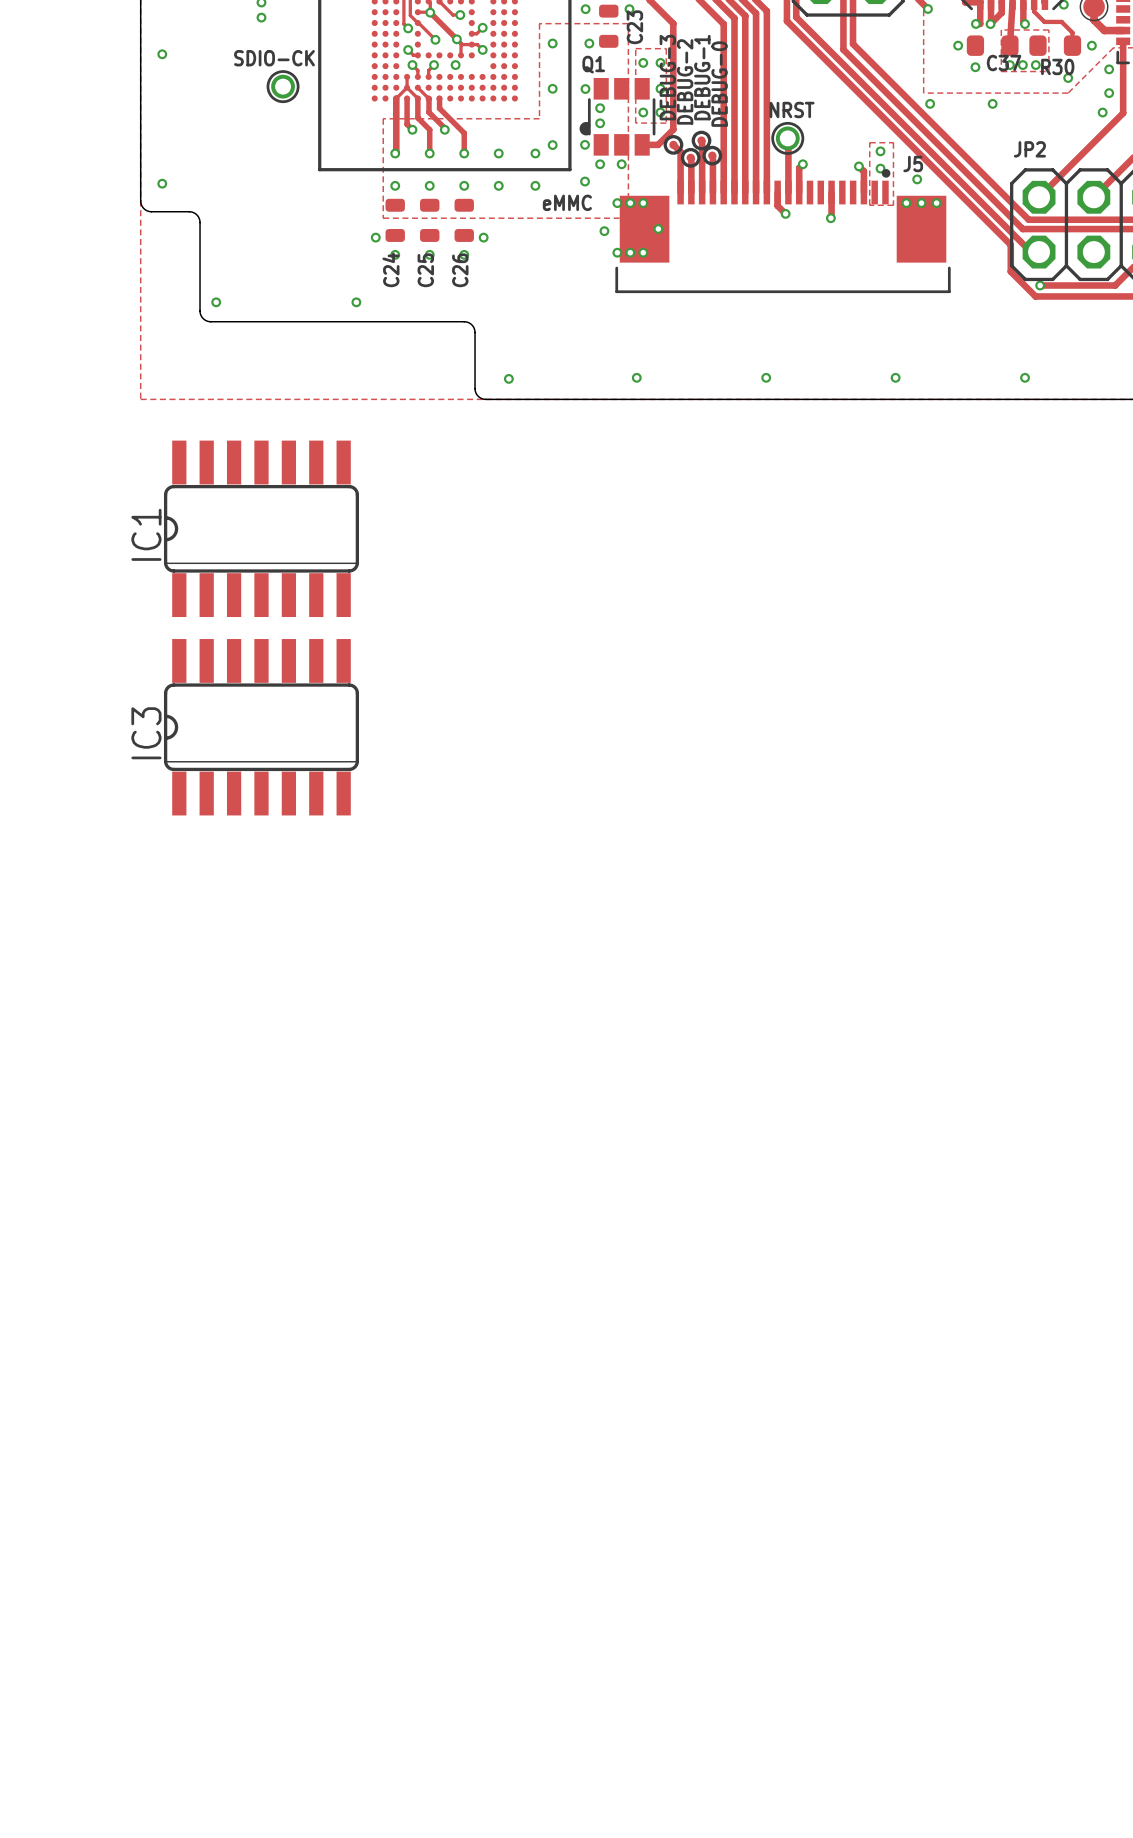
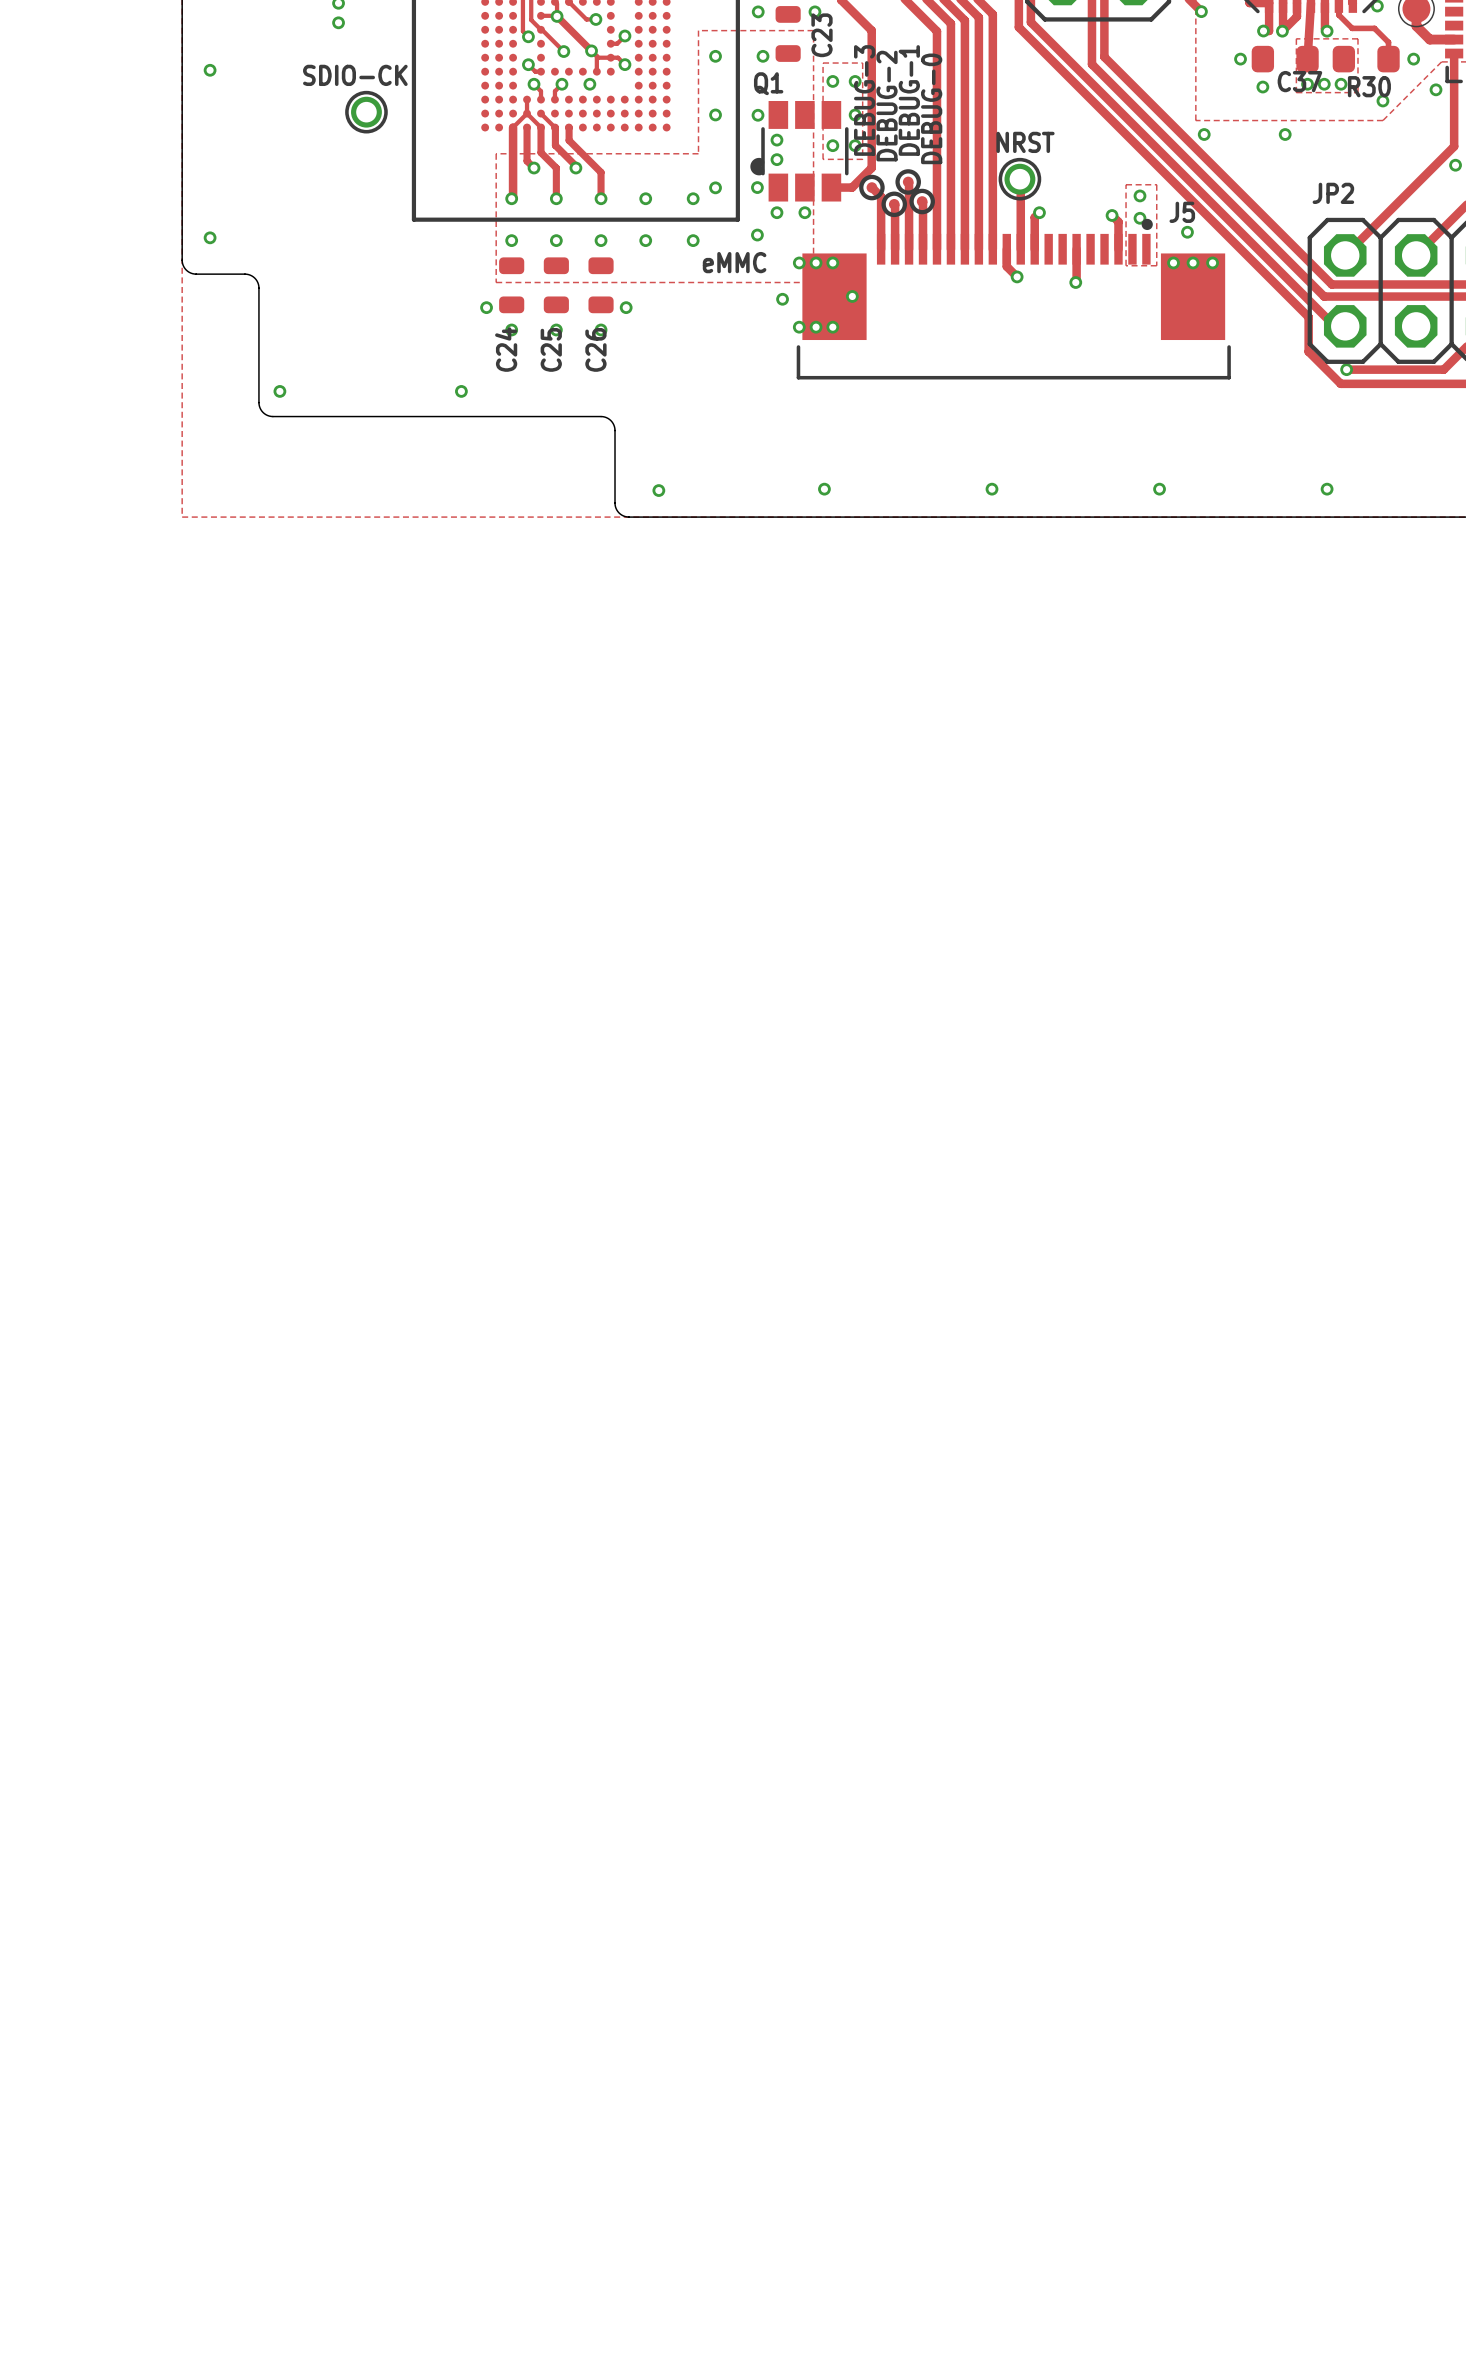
via: (1109, 93) -> none
via: (1102, 112) -> none
via: none -> (1455, 165)
IC1: (261, 528) -> none
IC3: (261, 727) -> none

